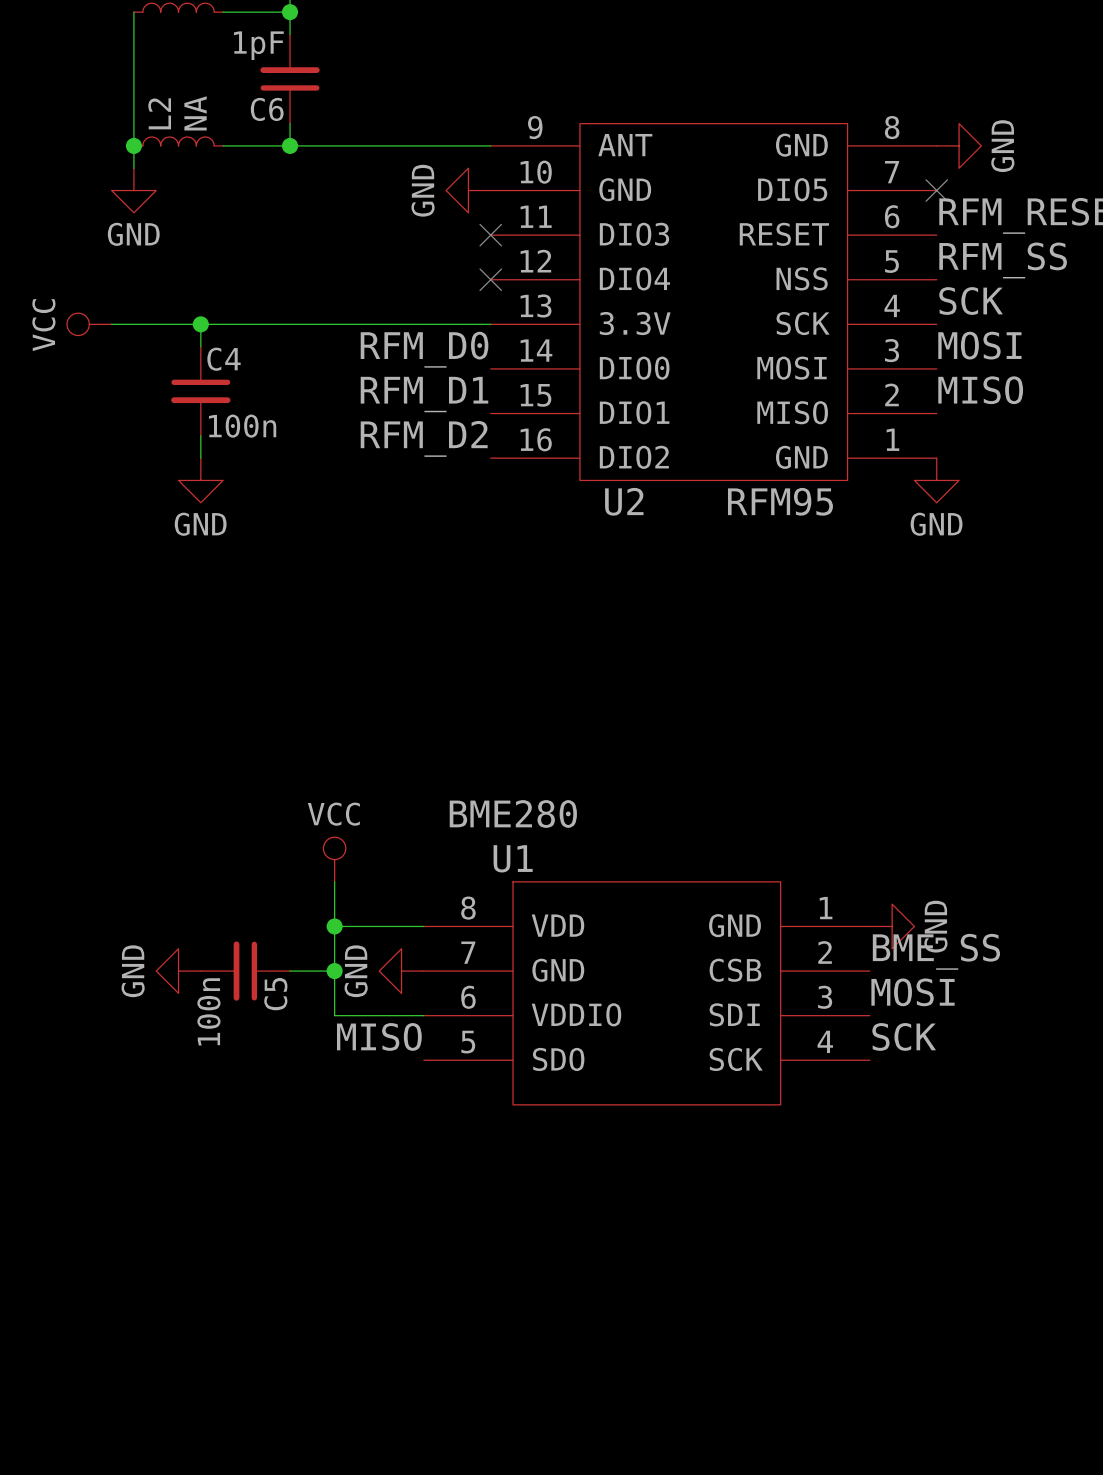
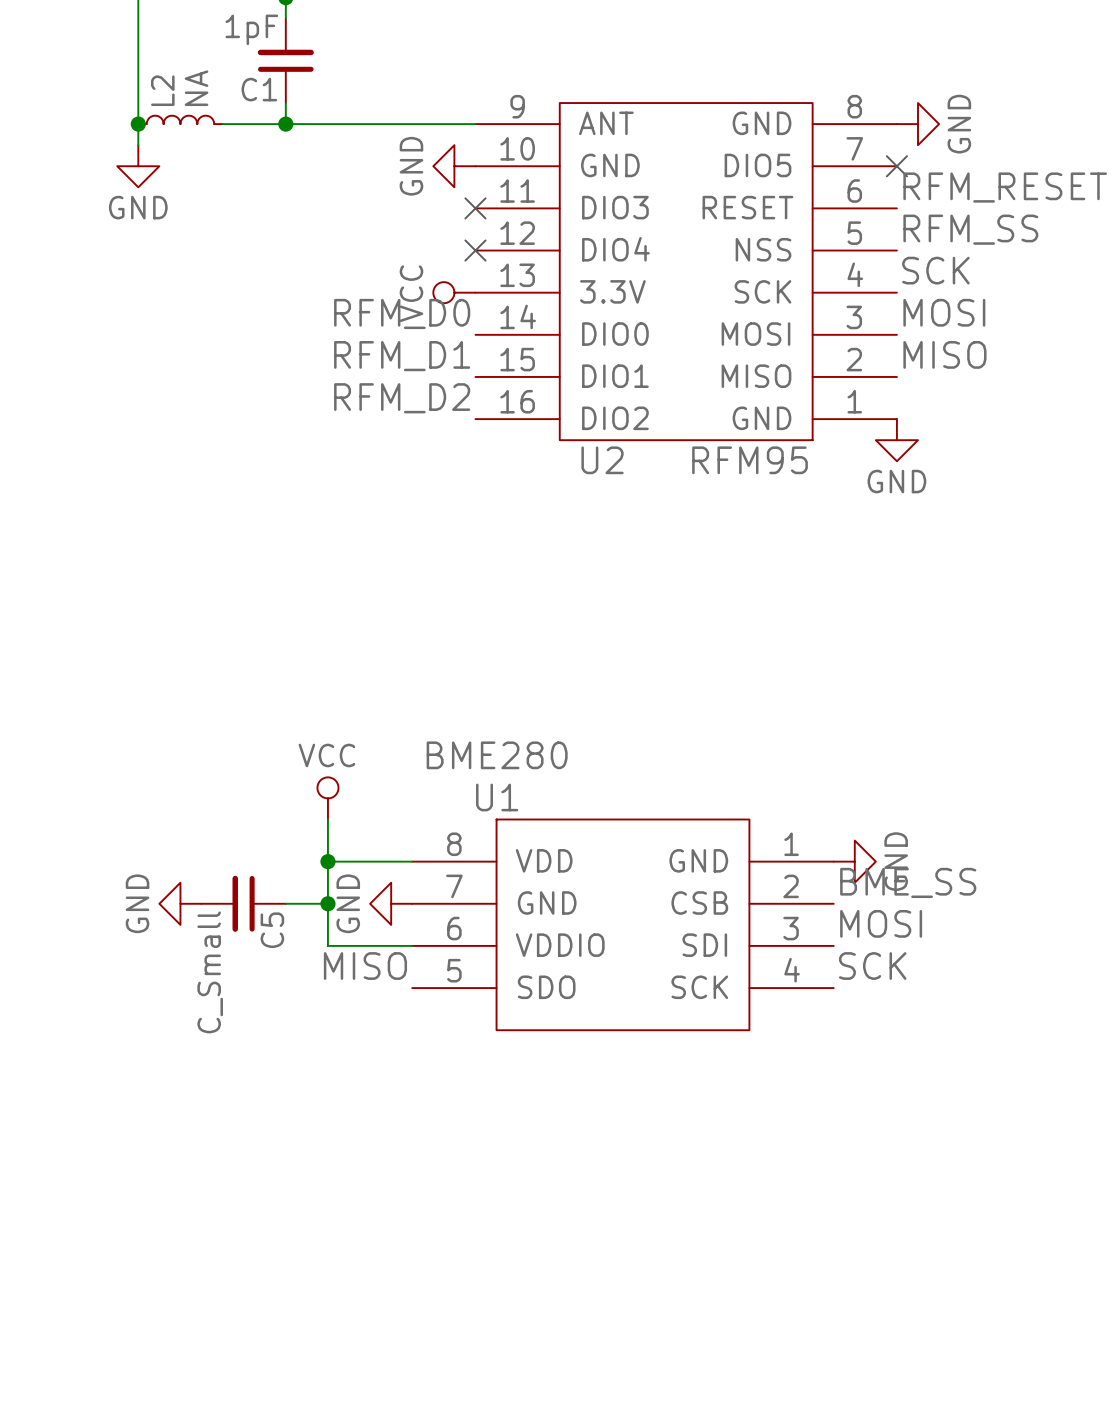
C6 name: C6 (267, 109) -> C1 (259, 89)
power symbol position: VCC (89, 324) -> VCC (454, 292)
wire: (111, 324) (490, 324) -> none
wire: (200, 324) (200, 346) -> none
junction: (200, 324) -> none
C4: 100n (200, 391) -> none
wire: (200, 435) (200, 458) -> none
power symbol: GND (200, 480) -> none
C5 value: 100n (208, 1011) -> C_Small (210, 972)

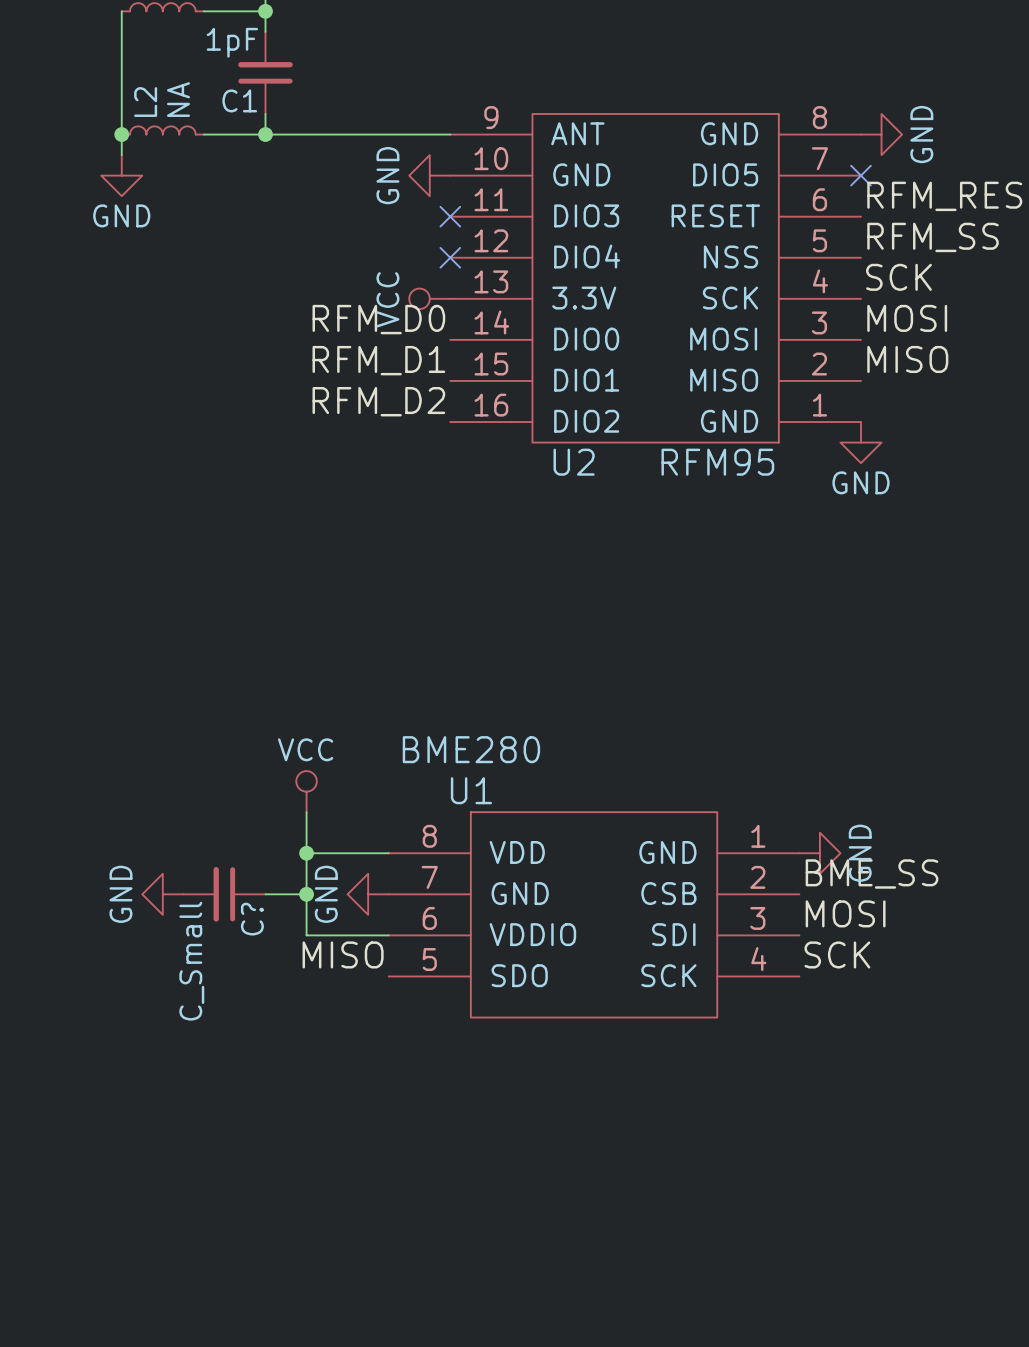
C5 name: C5 (272, 930) -> C? (252, 919)

